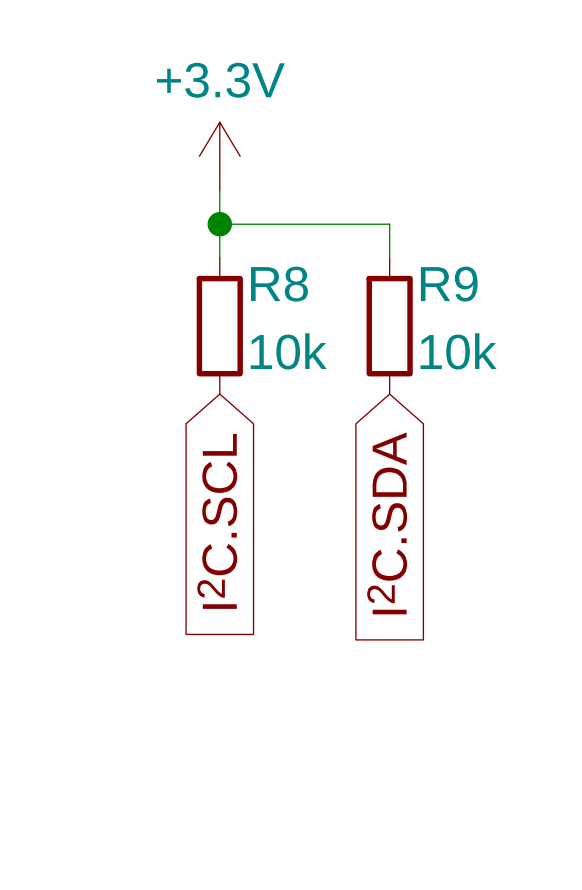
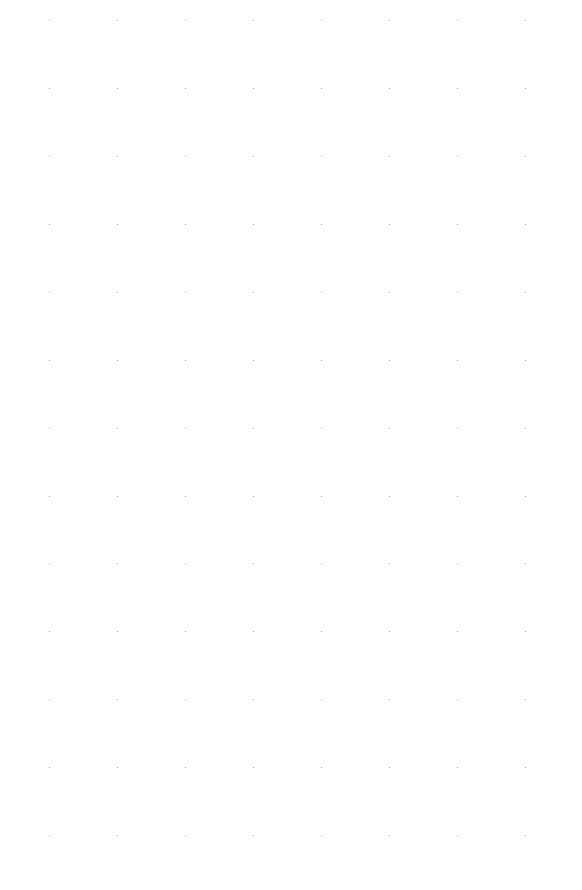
power symbol: +3.3V (219, 156) -> none
wire: (219, 190) (219, 258) -> none
wire: (219, 224) (389, 224) (389, 258) -> none
junction: (219, 224) -> none
R8: 10k (219, 326) -> none
R9: 10k (389, 326) -> none
global label: I2C.SCL (217, 521) -> none
global label: I2C.SDA (387, 523) -> none

